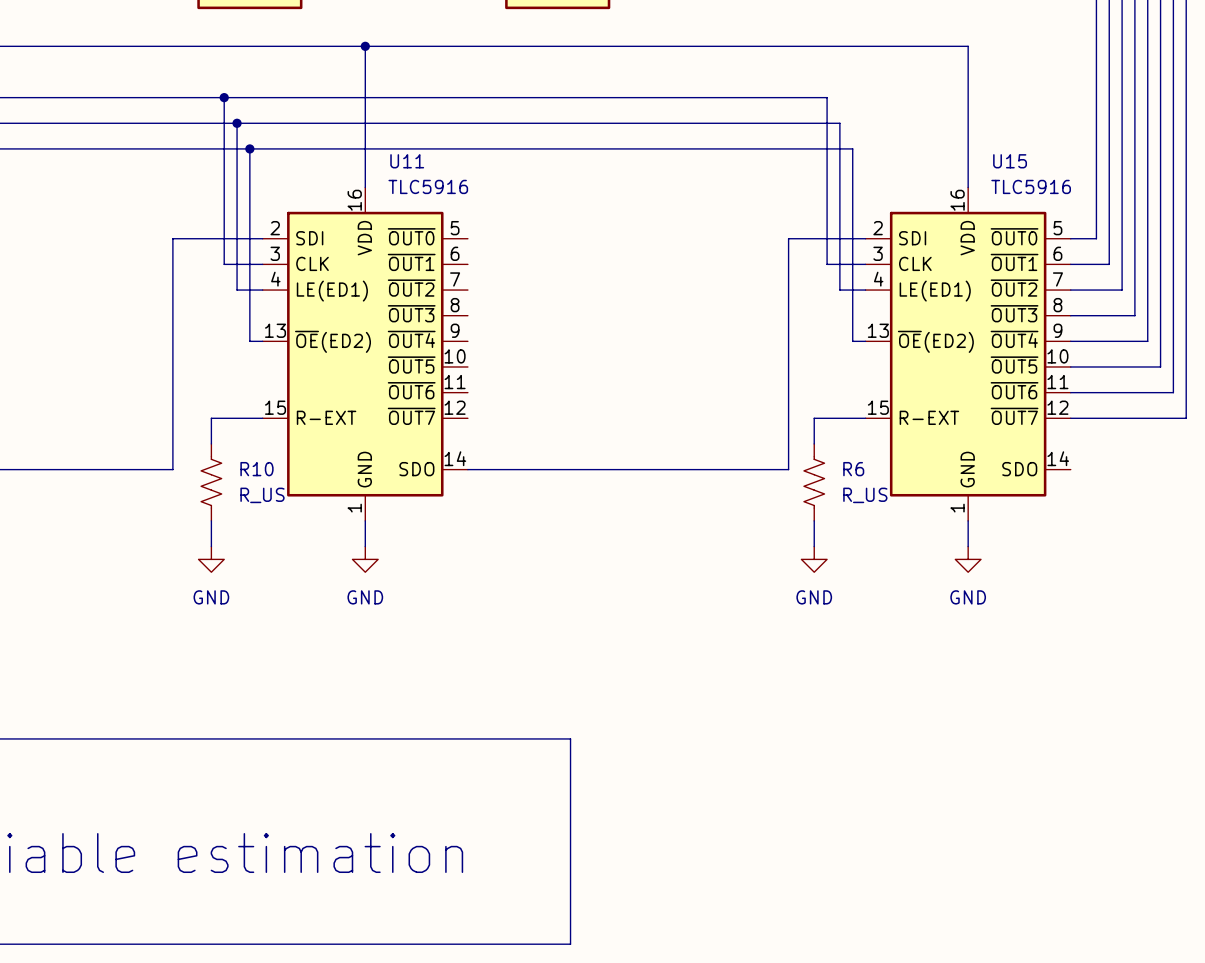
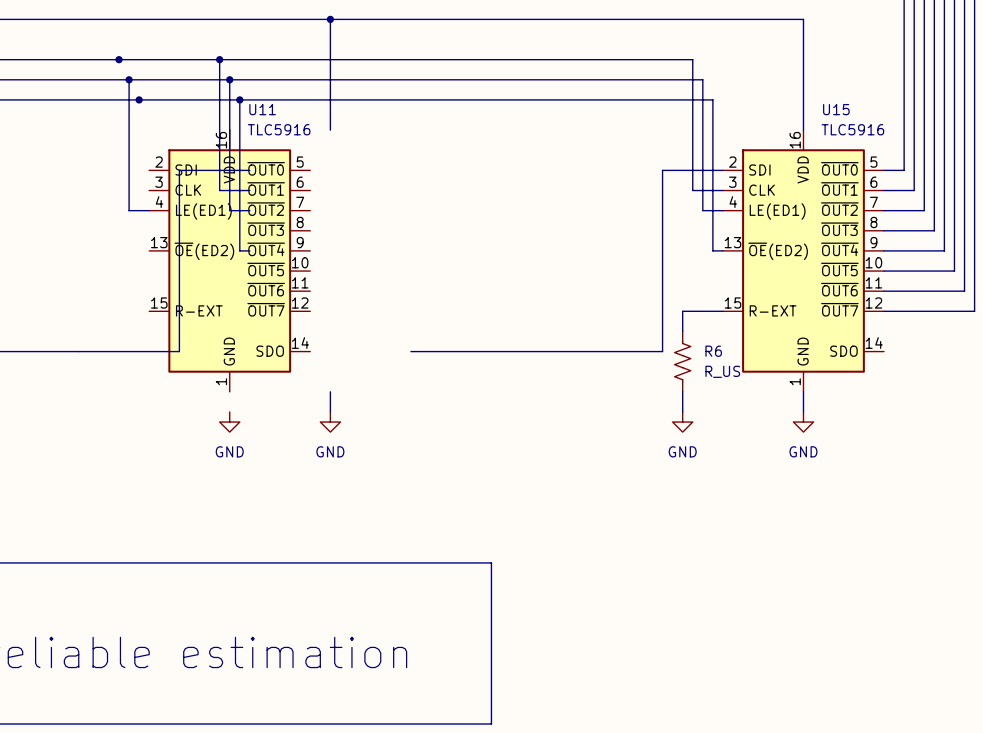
junction: none -> (119, 59)
wire: none -> (129, 79) (129, 210) (149, 210)
junction: none -> (129, 79)
junction: none -> (139, 99)
U11 position: (365, 354) -> (229, 260)
R10: R_US (211, 482) -> none
wire: (211, 520) (211, 546) -> none
power symbol position: GND (211, 559) -> GND (229, 422)

